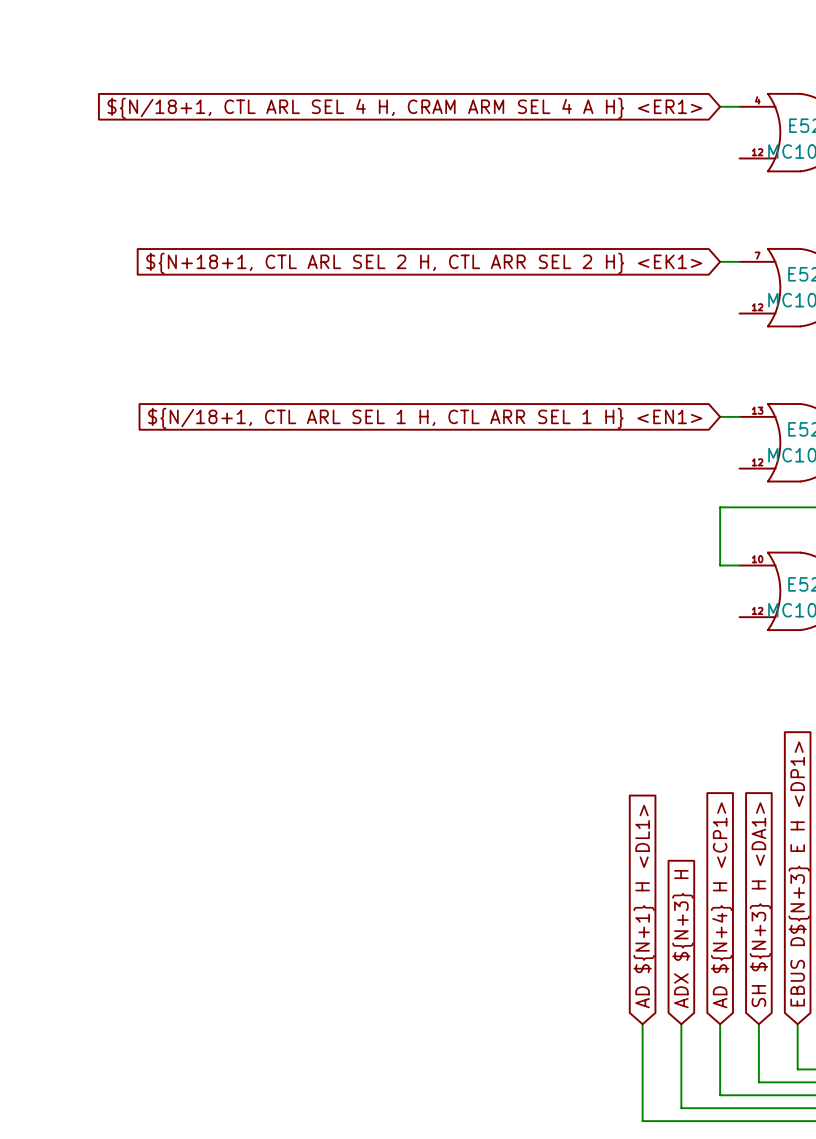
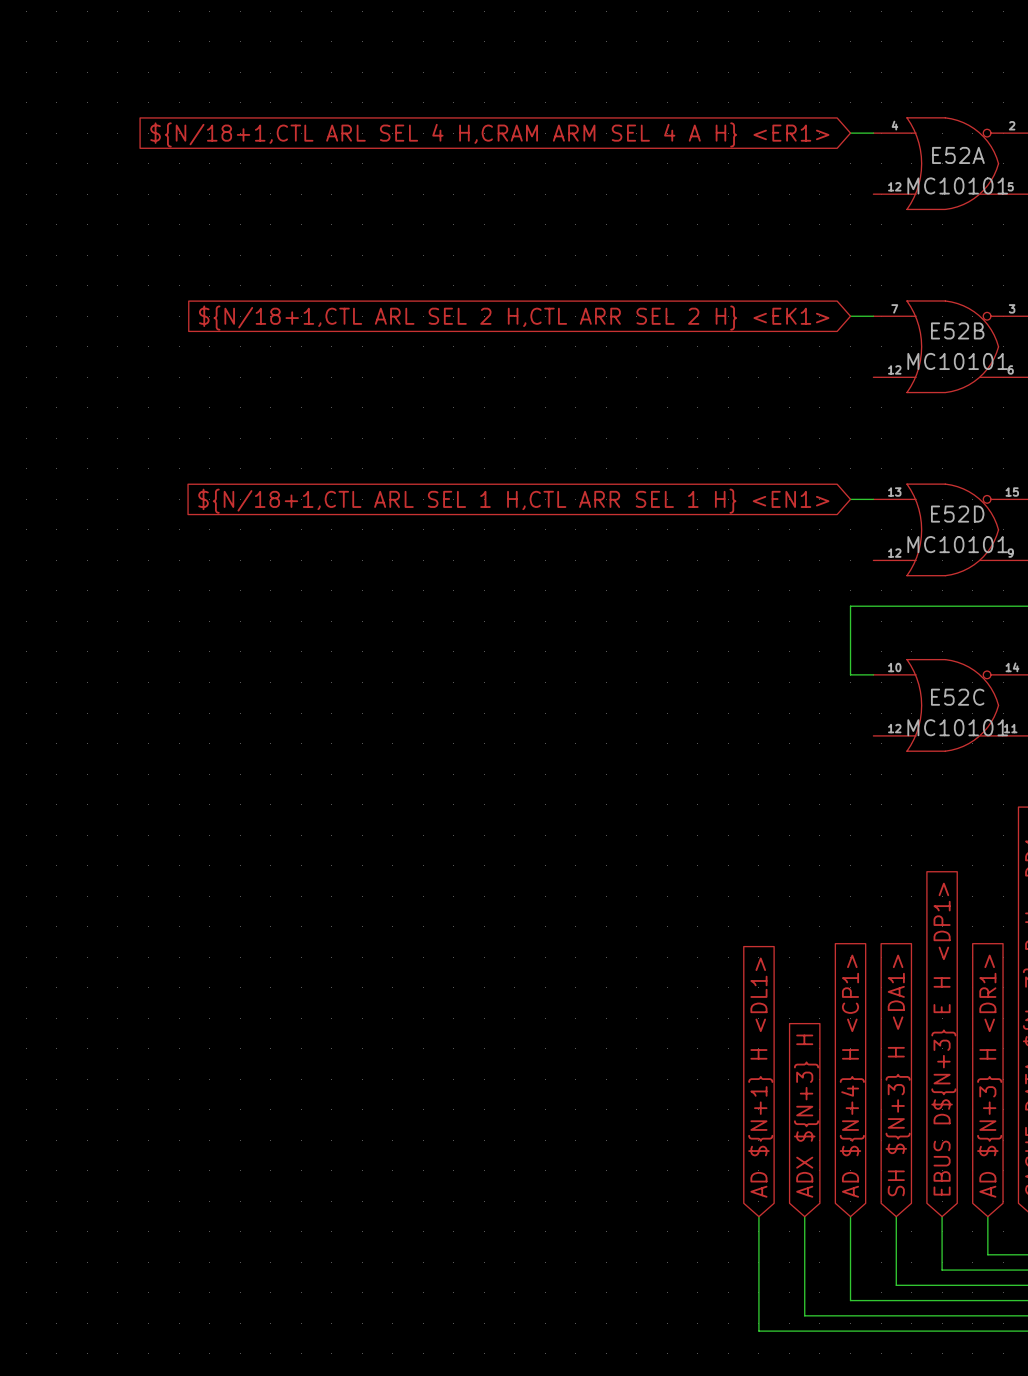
global label: ${N/18+1, CTL ARL SEL 4 H, CRAM ARM SEL 4 A H} <ER1> (404, 108) -> ${N/18+1,CTL ARL SEL 4 H,CRAM ARM SEL 4 A H} <ER1> (489, 134)
global label: ${N+18+1, CTL ARL SEL 2 H, CTL ARR SEL 2 H} <EK1> (424, 263) -> ${N/18+1,CTL ARL SEL 2 H,CTL ARR SEL 2 H} <EK1> (514, 318)
global label: ${N/18+1, CTL ARL SEL 1 H, CTL ARR SEL 1 H} <EN1> (425, 418) -> ${N/18+1,CTL ARL SEL 1 H,CTL ARR SEL 1 H} <EN1> (513, 501)

